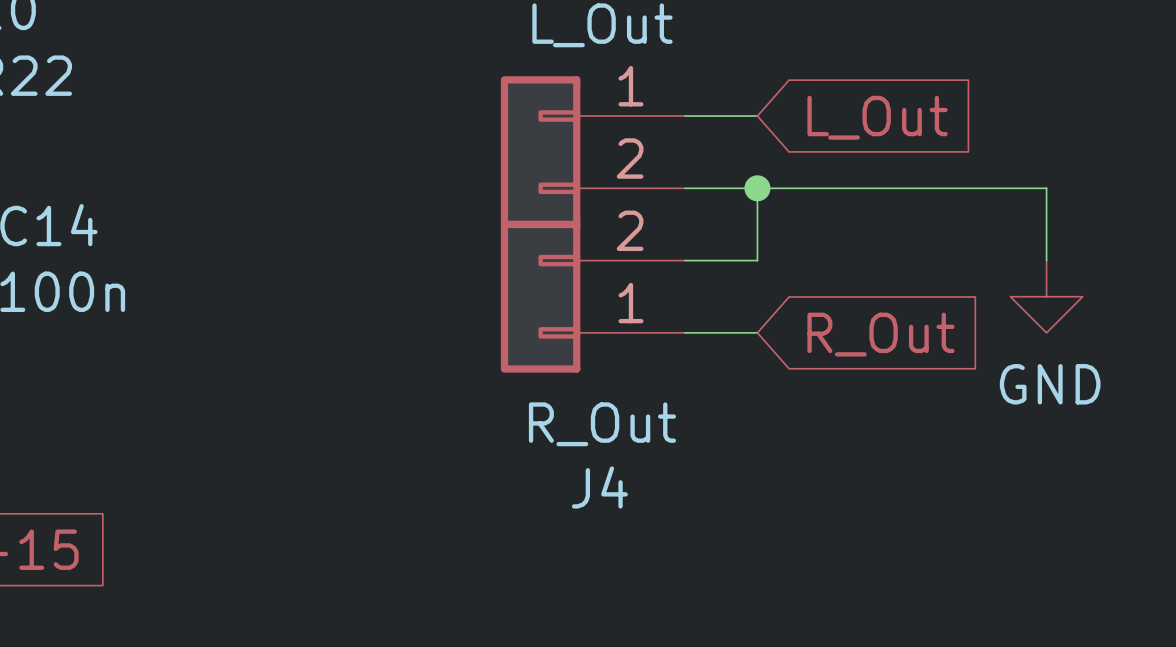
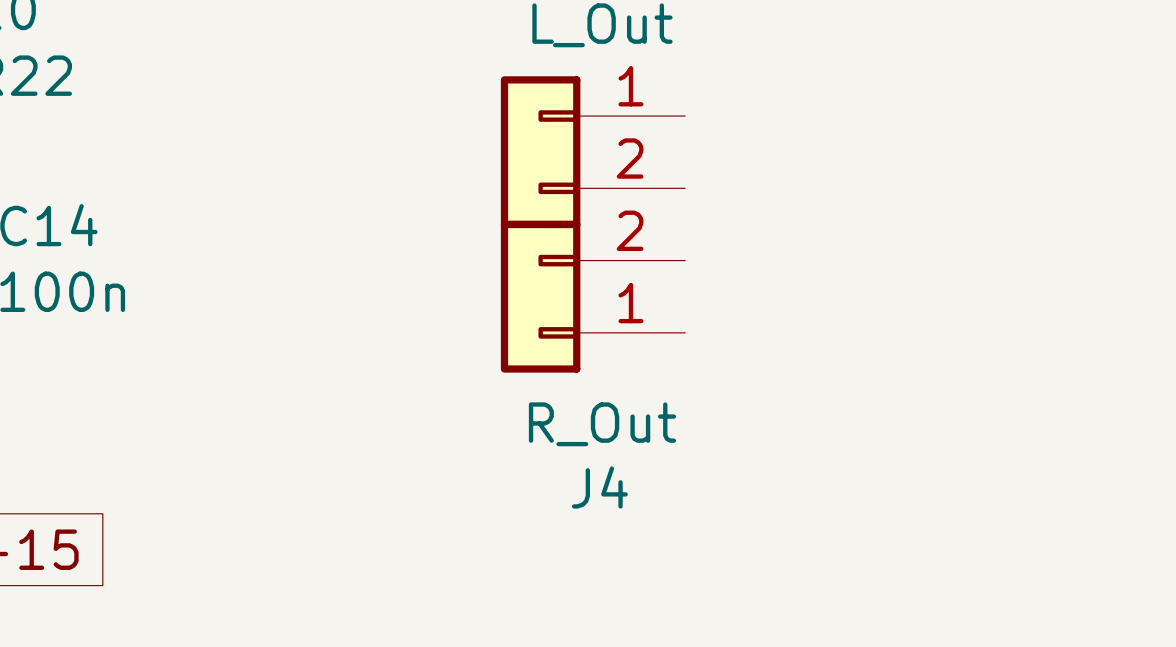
wire: (685, 116) (757, 116) -> none
global label: L_Out (877, 117) -> none
wire: (685, 188) (1046, 188) (1046, 260) -> none
wire: (757, 188) (757, 260) (685, 260) -> none
junction: (757, 188) -> none
power symbol: GND (1046, 296) -> none
wire: (685, 332) (757, 332) -> none
global label: R_Out (880, 334) -> none

